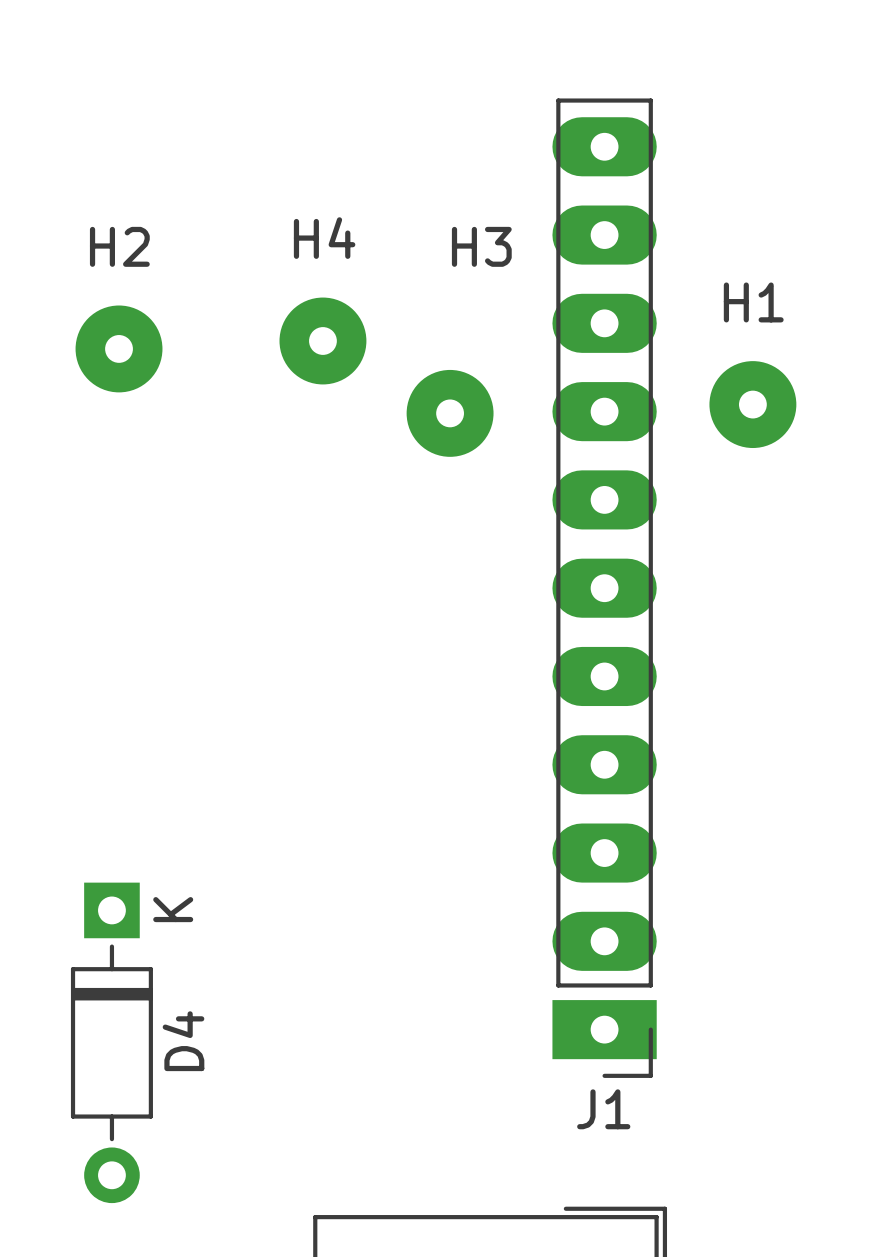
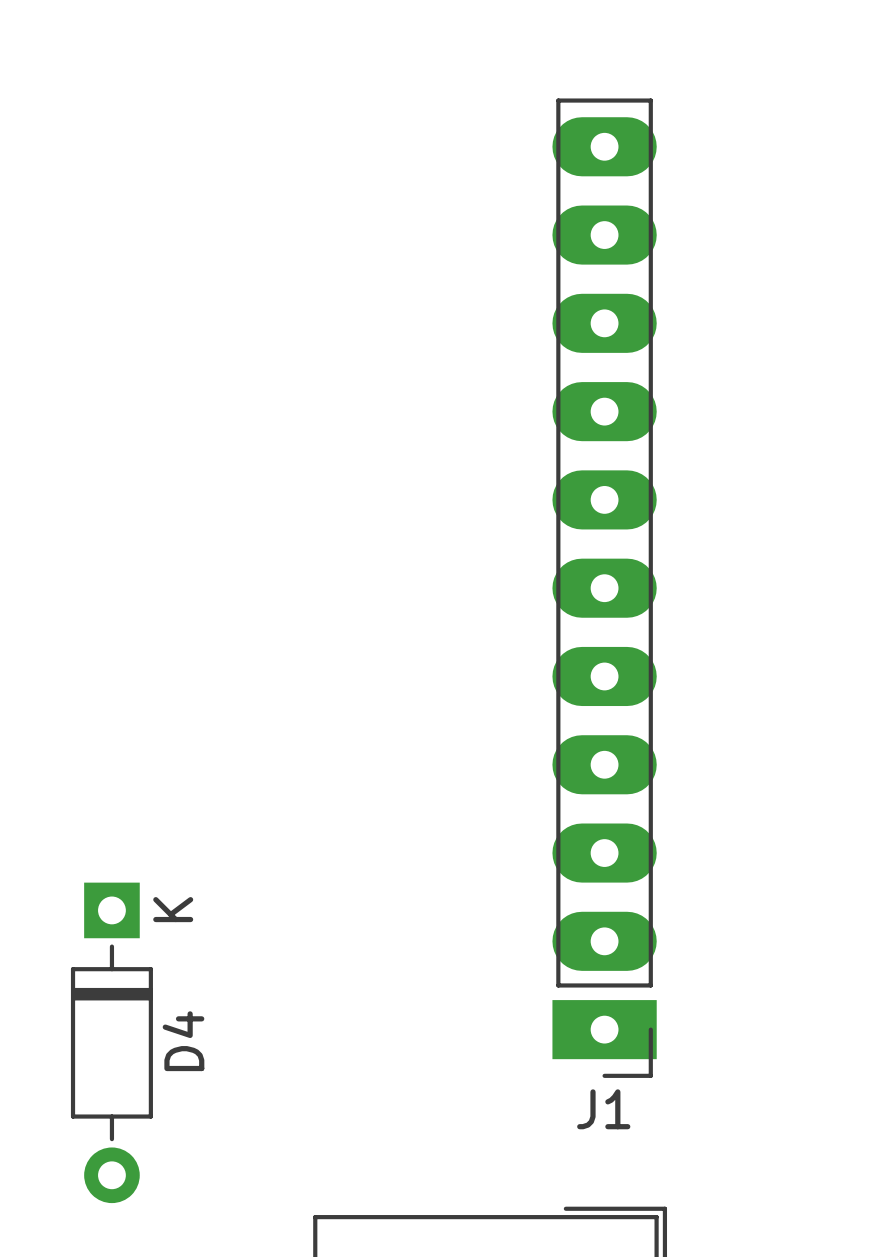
H4: (322, 340) -> none
H2: (119, 348) -> none
H1: (752, 404) -> none
H3: (450, 413) -> none

